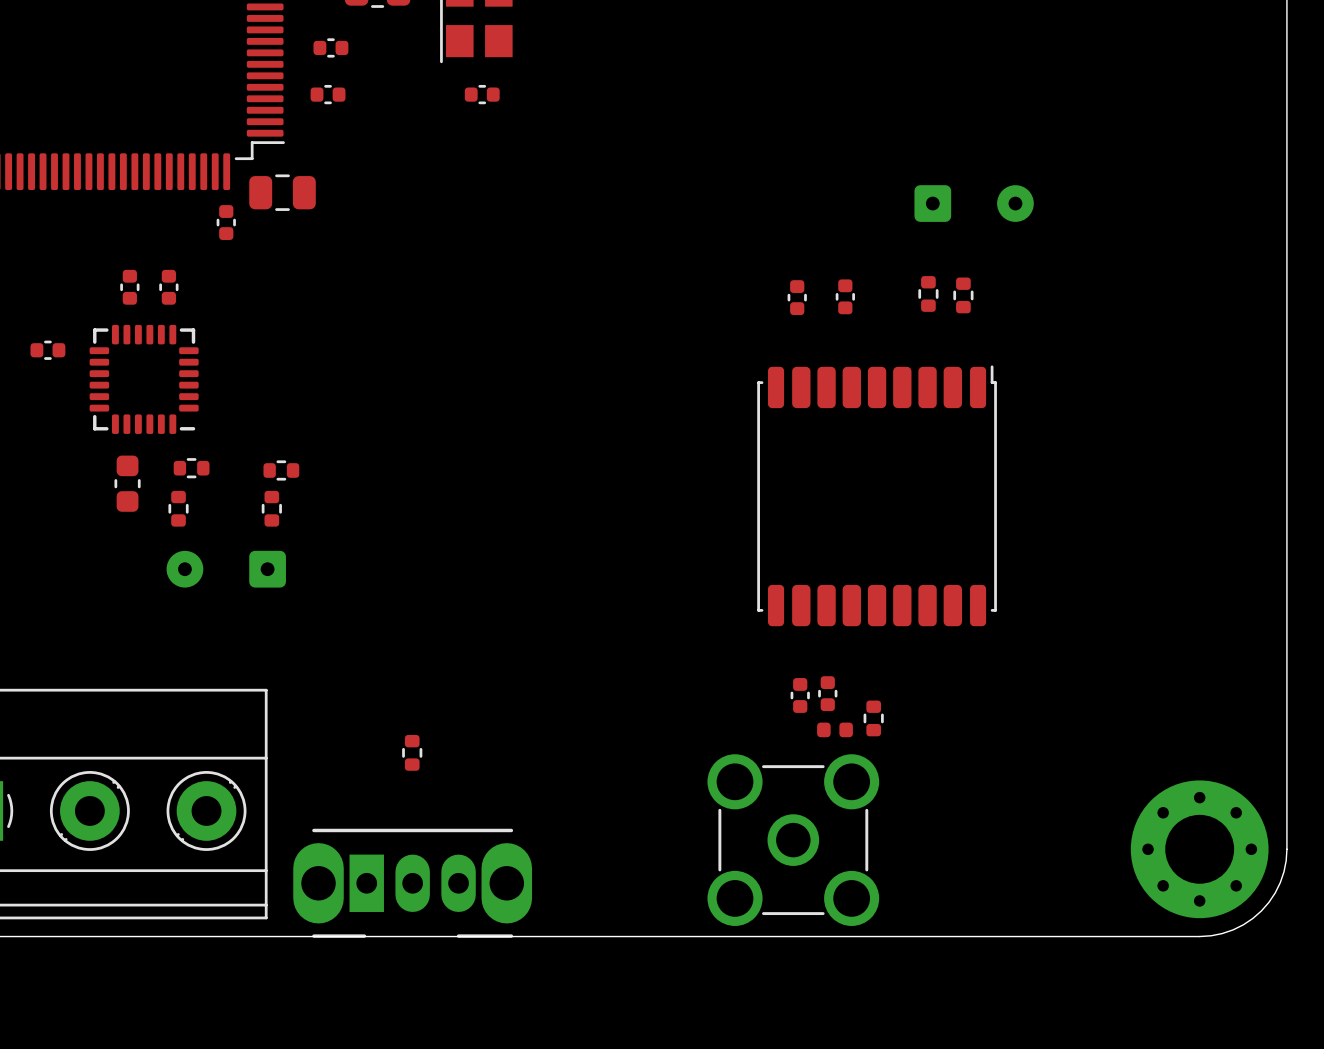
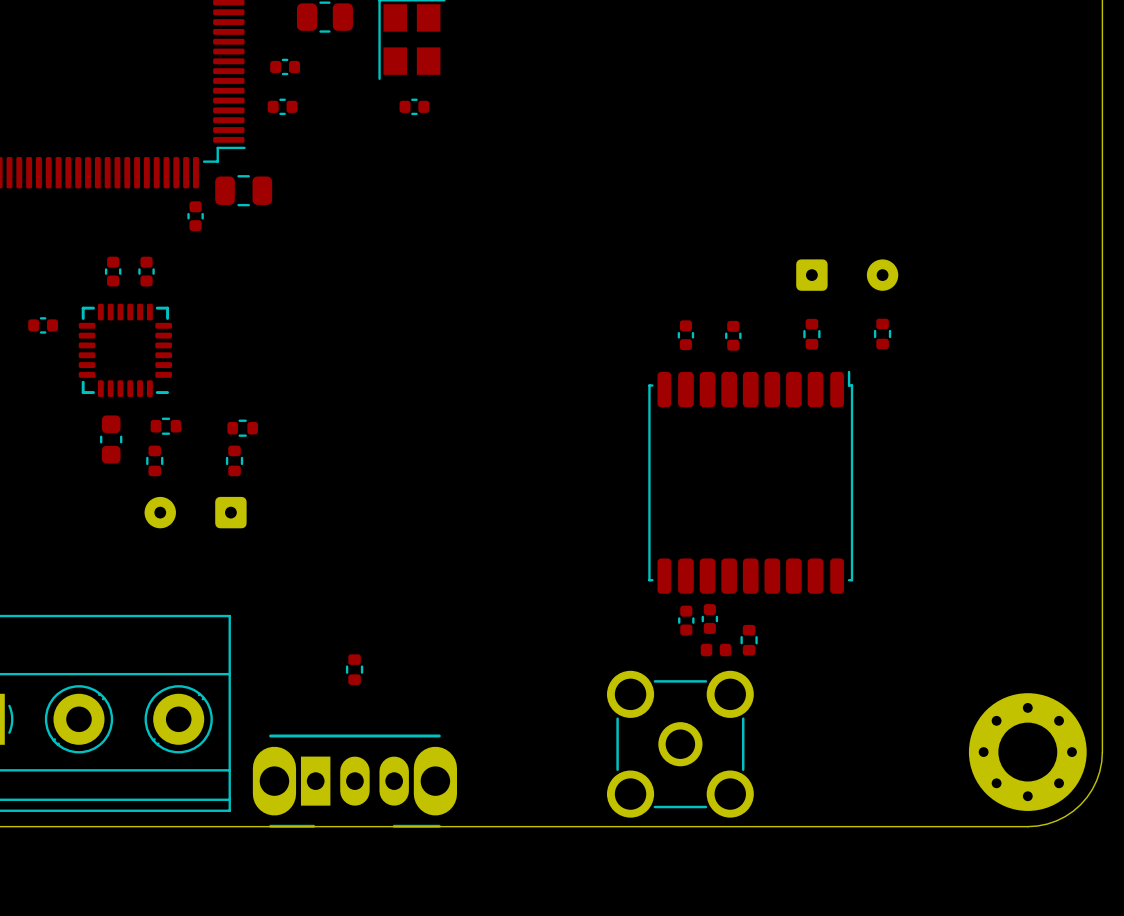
part position: (974, 203) -> (847, 275)
part: (928, 293) -> none
part: (963, 295) -> none
part: (845, 296) -> none
part: (797, 297) -> none
part: none -> (811, 334)
part: none -> (882, 333)
part: none -> (685, 335)
part: none -> (733, 335)
part position: (877, 495) -> (750, 482)

